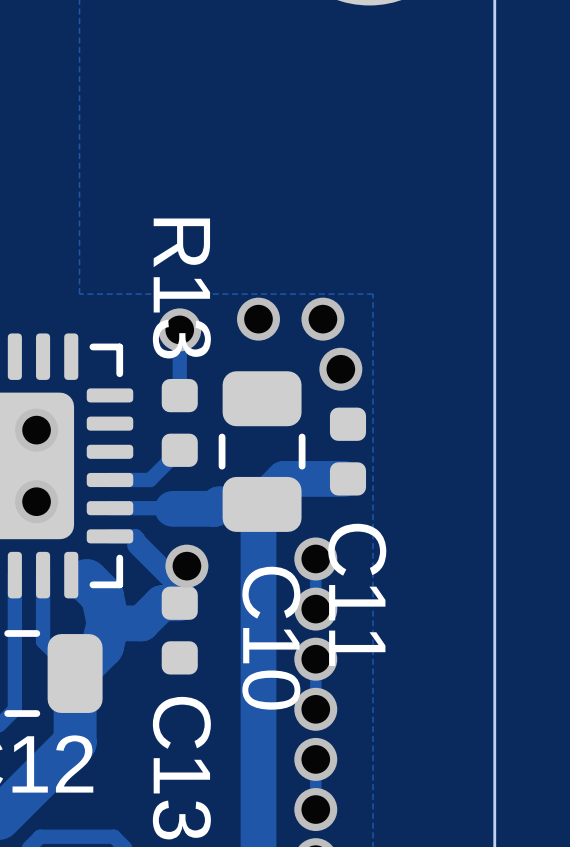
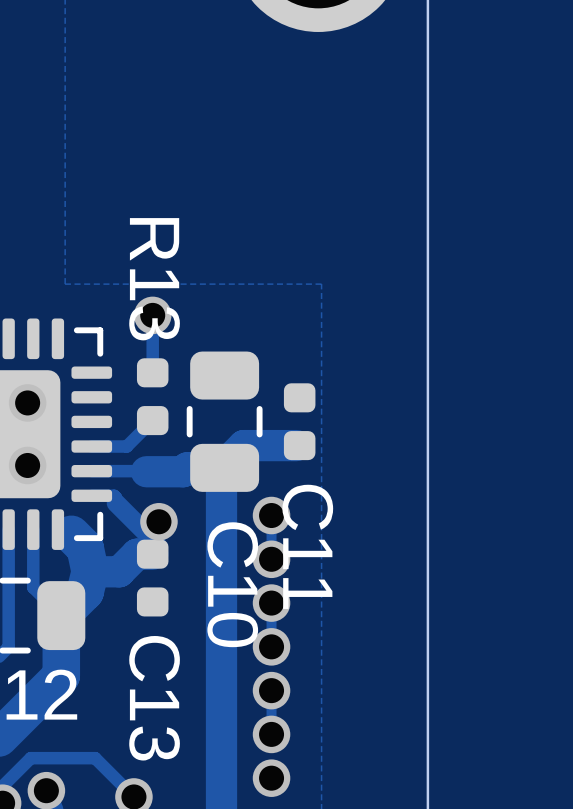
via: (258, 319) -> none
via: (322, 319) -> none
via: (340, 369) -> none

